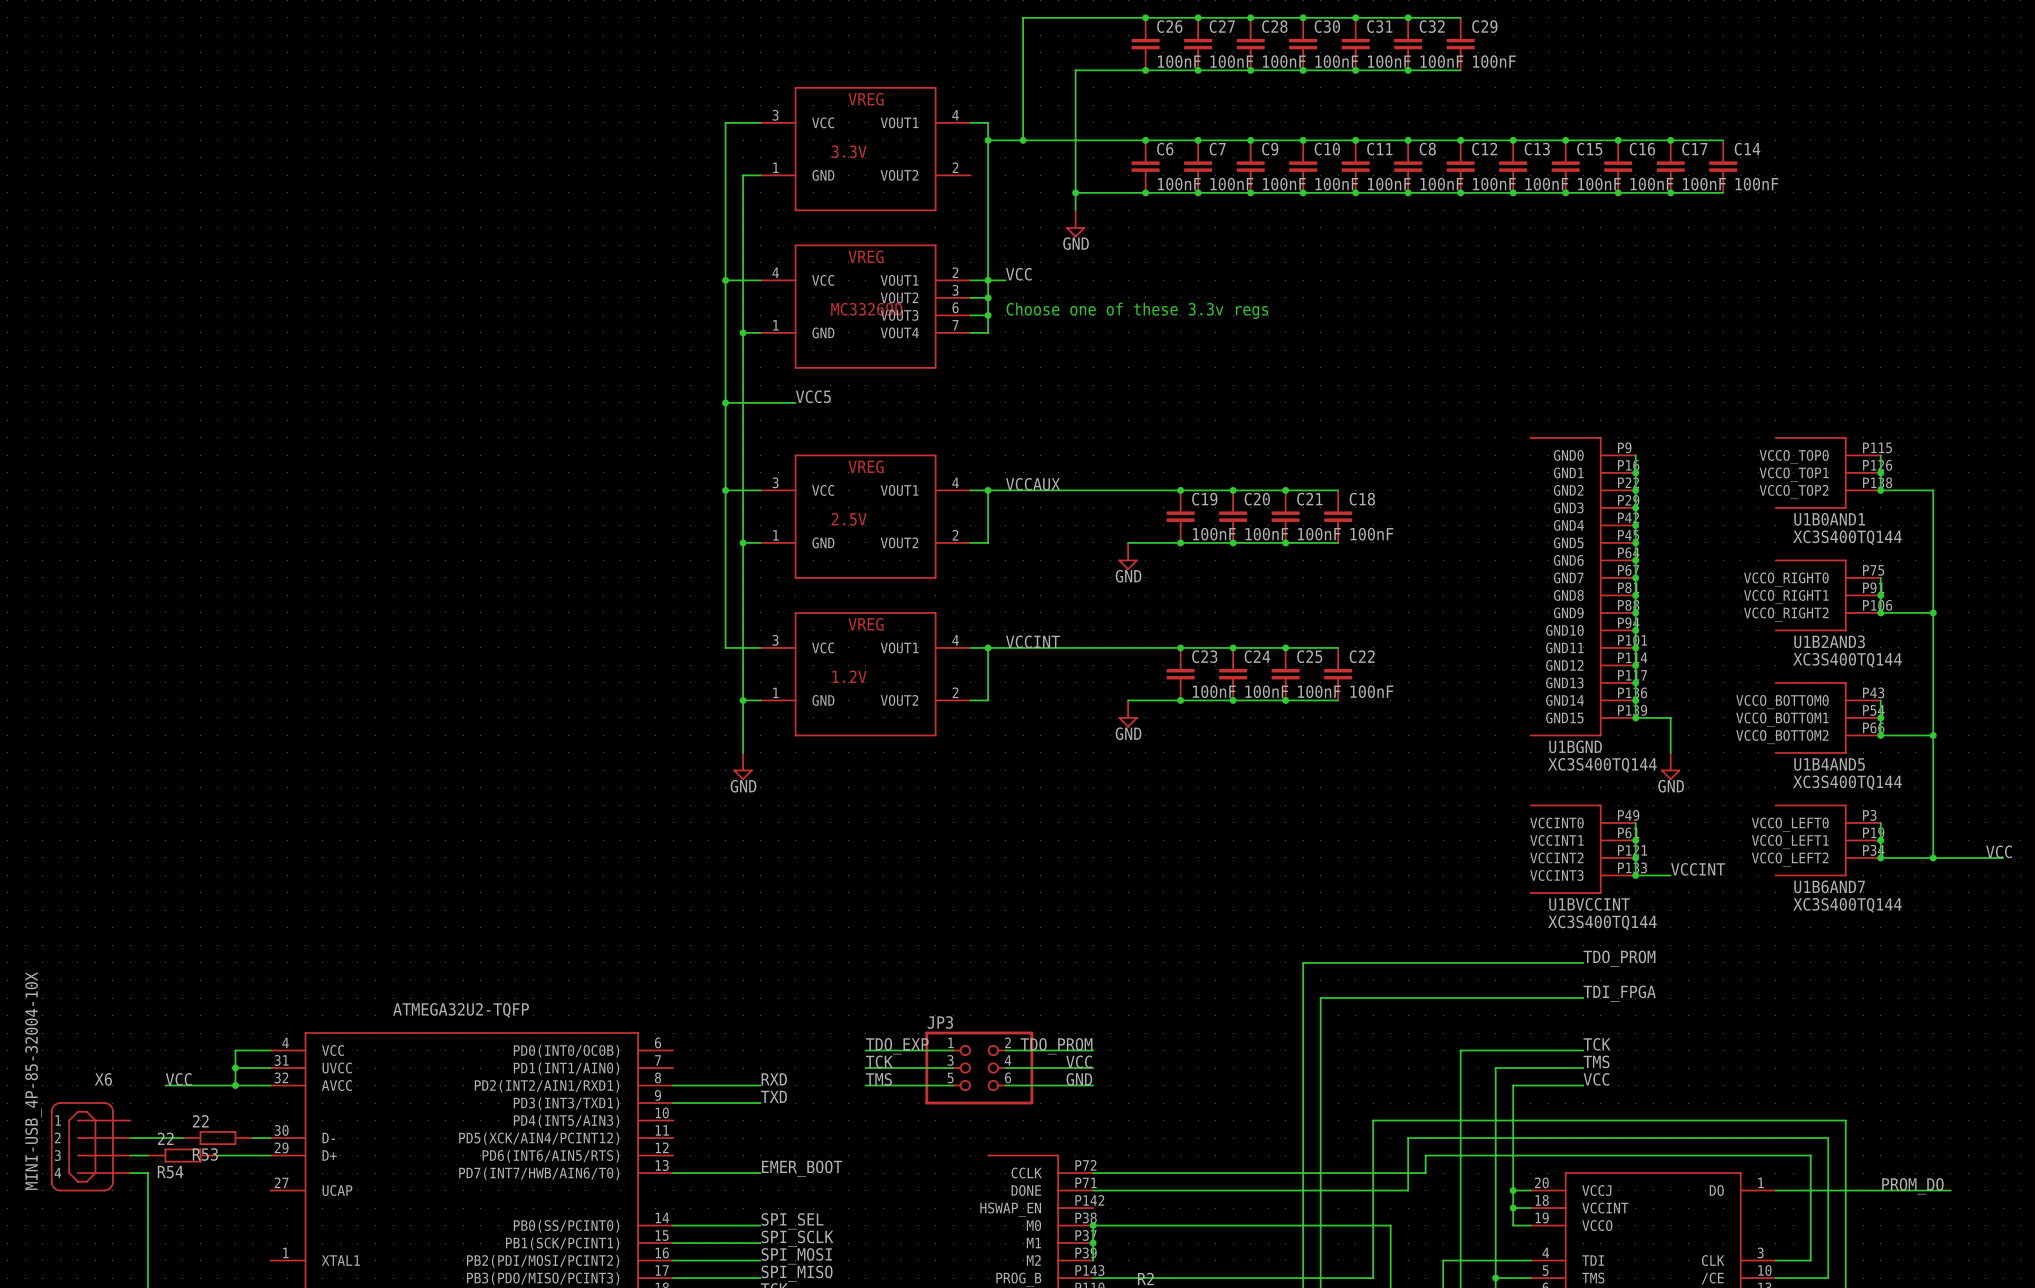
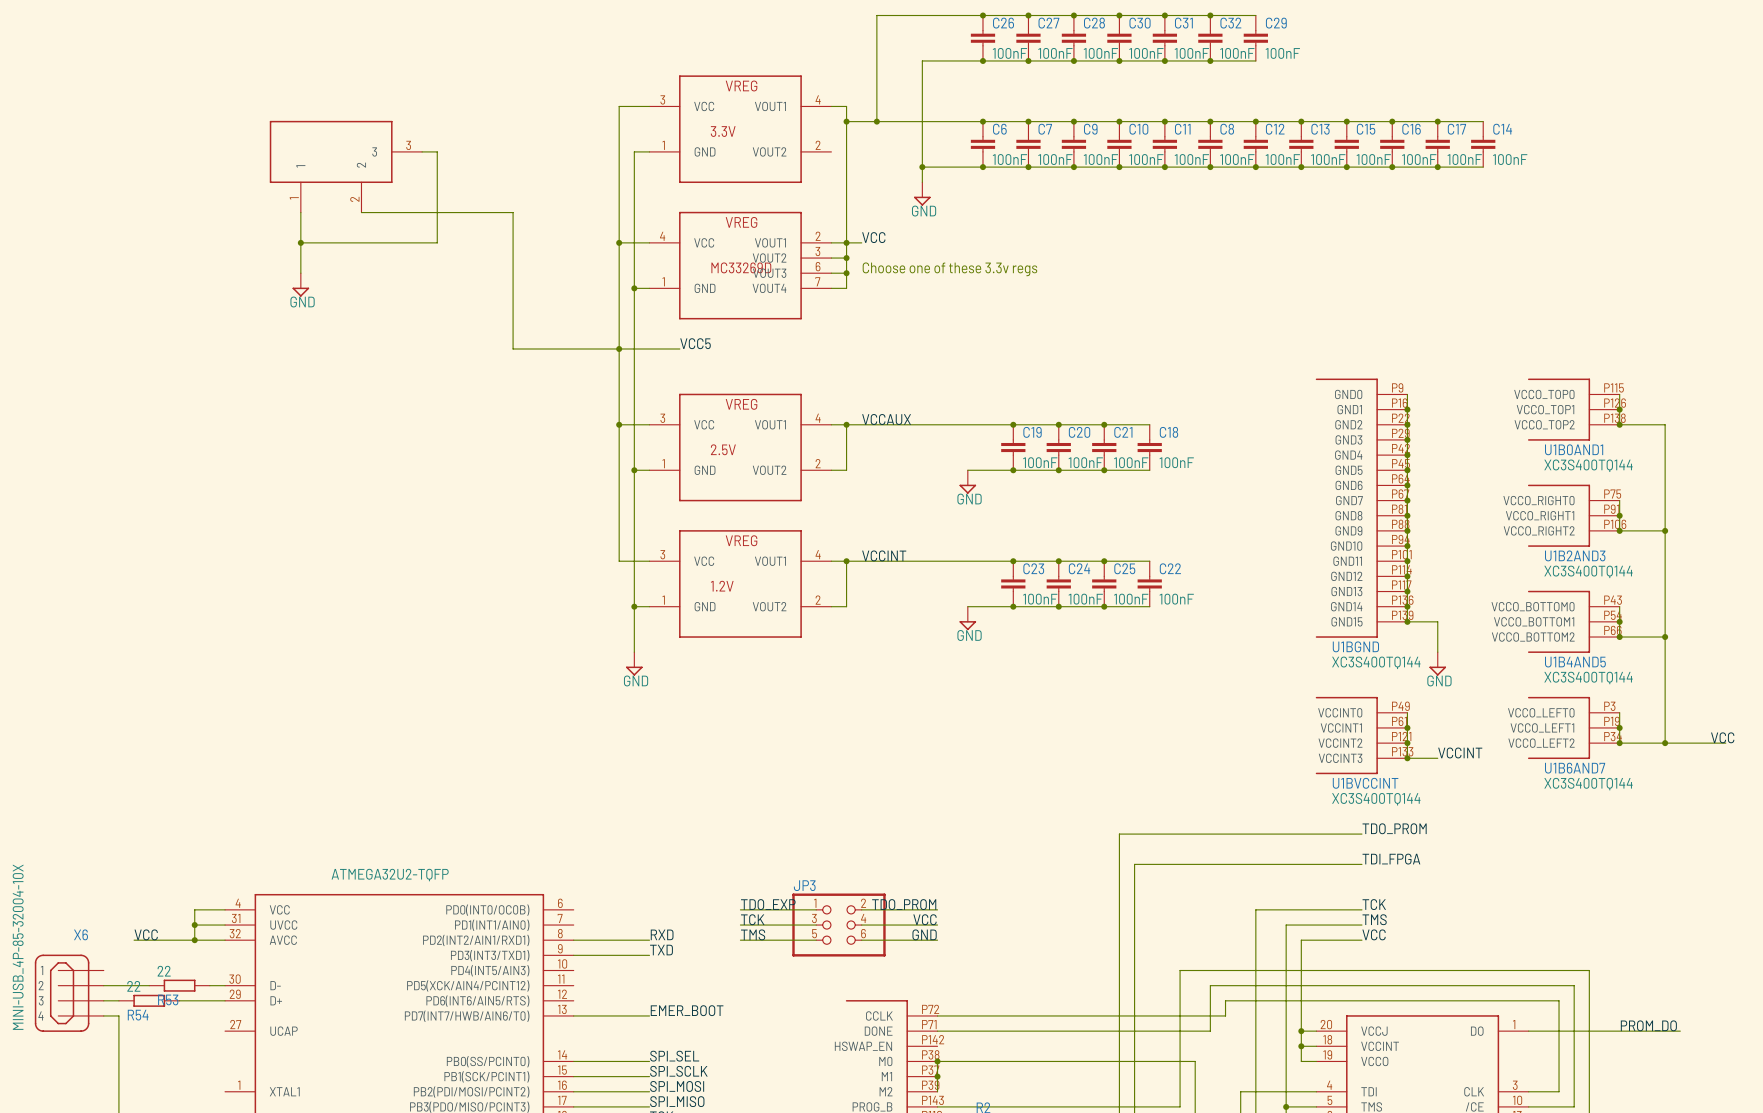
wire: none -> (422, 151) (437, 151) (437, 242) (300, 242)
part: none -> (345, 166)
wire: none -> (300, 212) (300, 273)
wire: none -> (361, 212) (513, 212) (513, 348) (619, 348)
junction: none -> (300, 242)
power symbol: none -> GND (300, 284)

